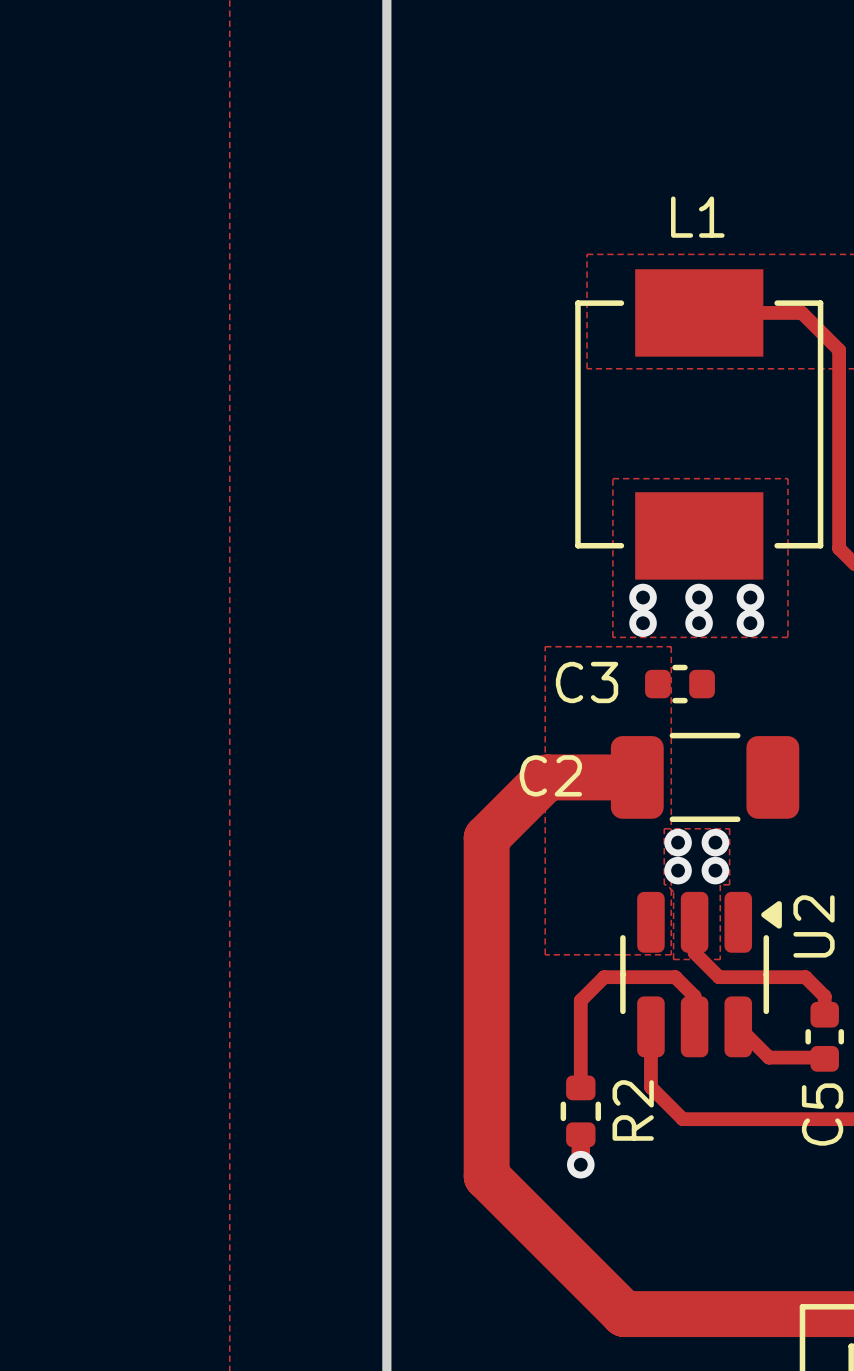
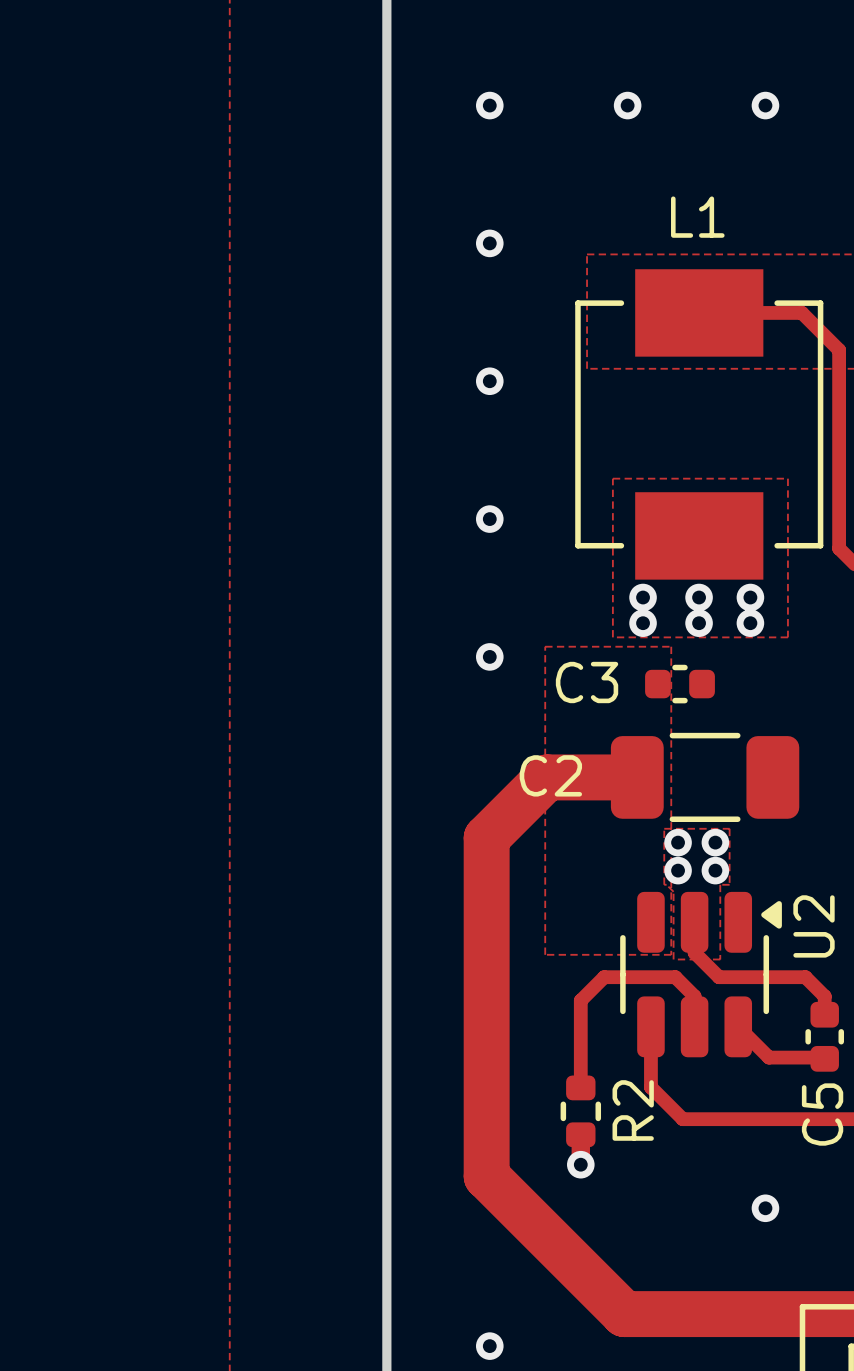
via: none -> (489, 105)
via: none -> (627, 105)
via: none -> (765, 105)
via: none -> (489, 243)
via: none -> (489, 381)
via: none -> (489, 519)
via: none -> (489, 656)
via: none -> (765, 1208)
via: none -> (489, 1346)

